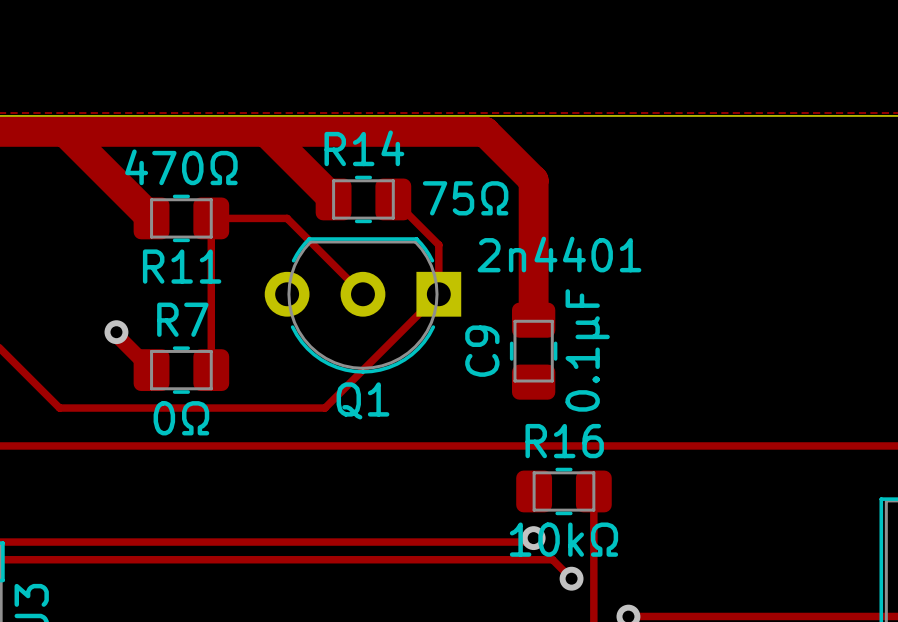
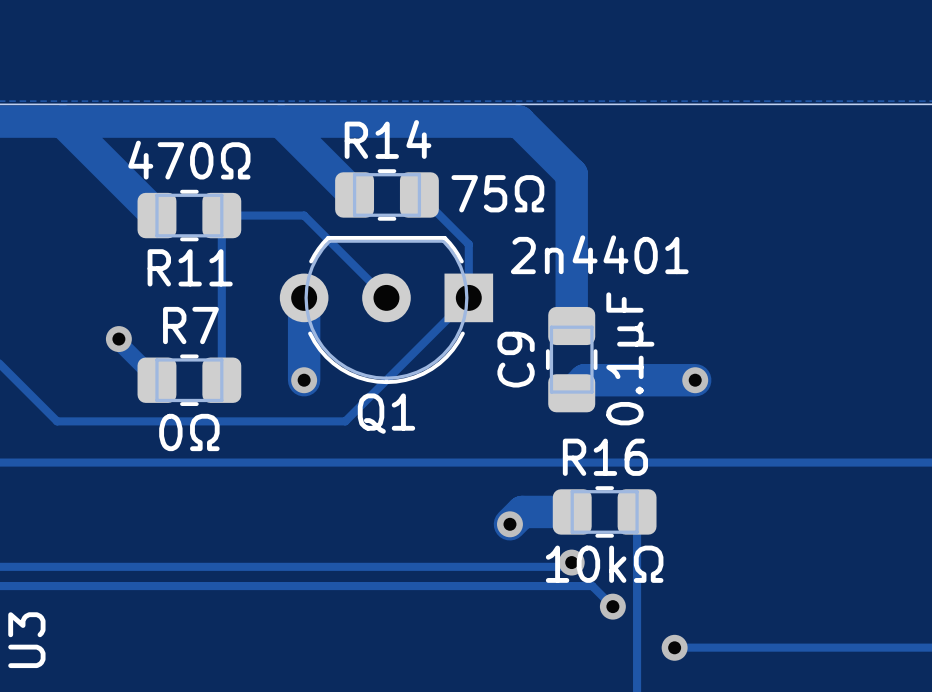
track: none -> (304, 297) (304, 380)
via: none -> (304, 380)
track: none -> (695, 380) (584, 380) (571, 393)
via: none -> (695, 380)
track: none -> (572, 511) (522, 511) (509, 524)
via: none -> (509, 524)

